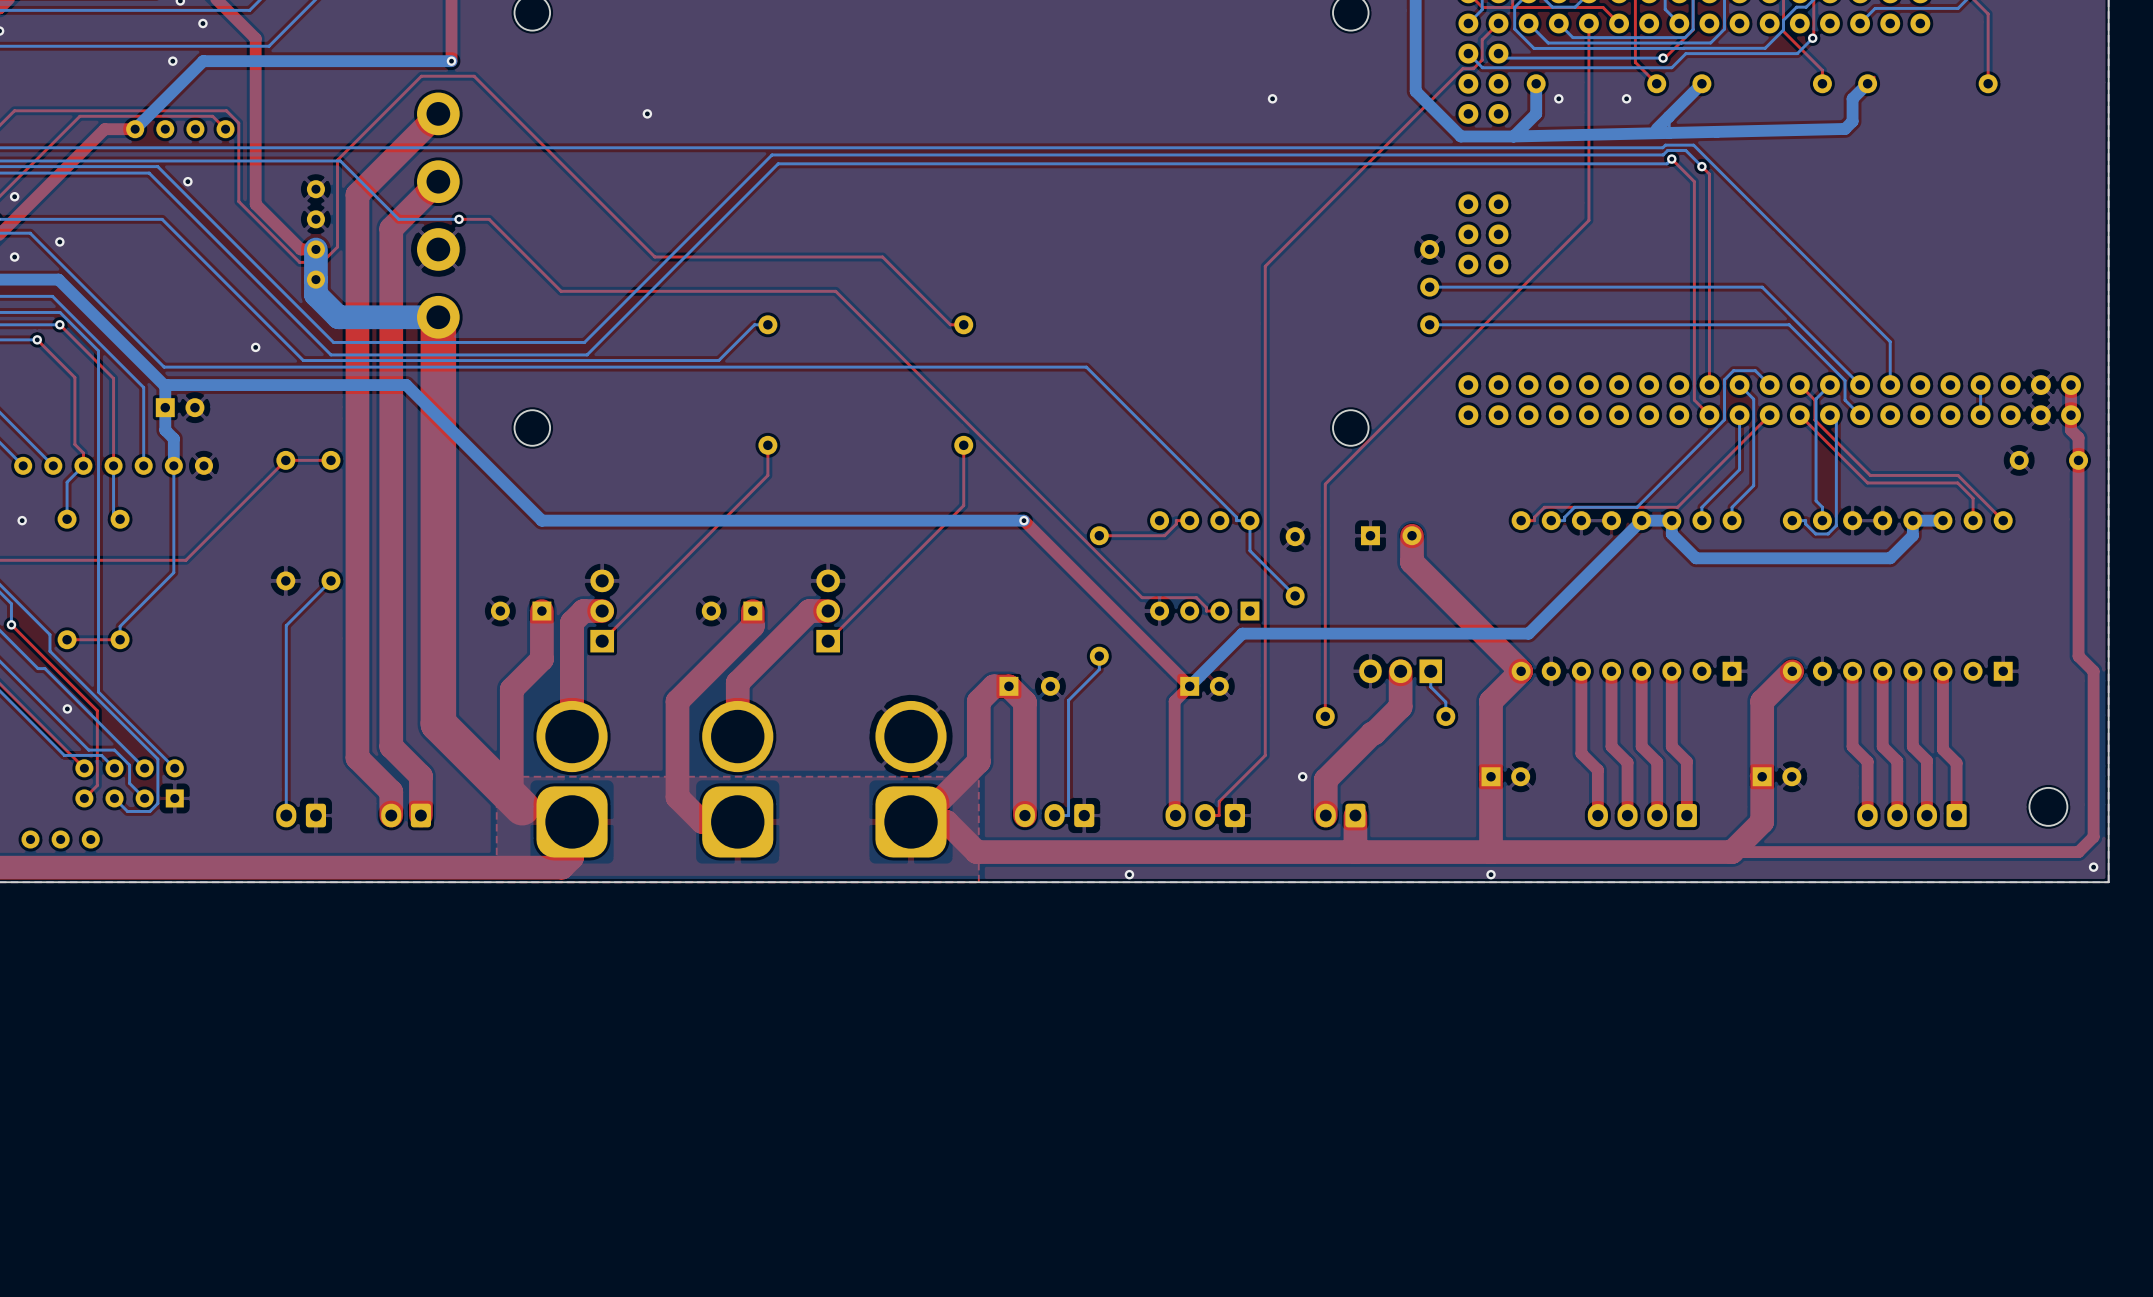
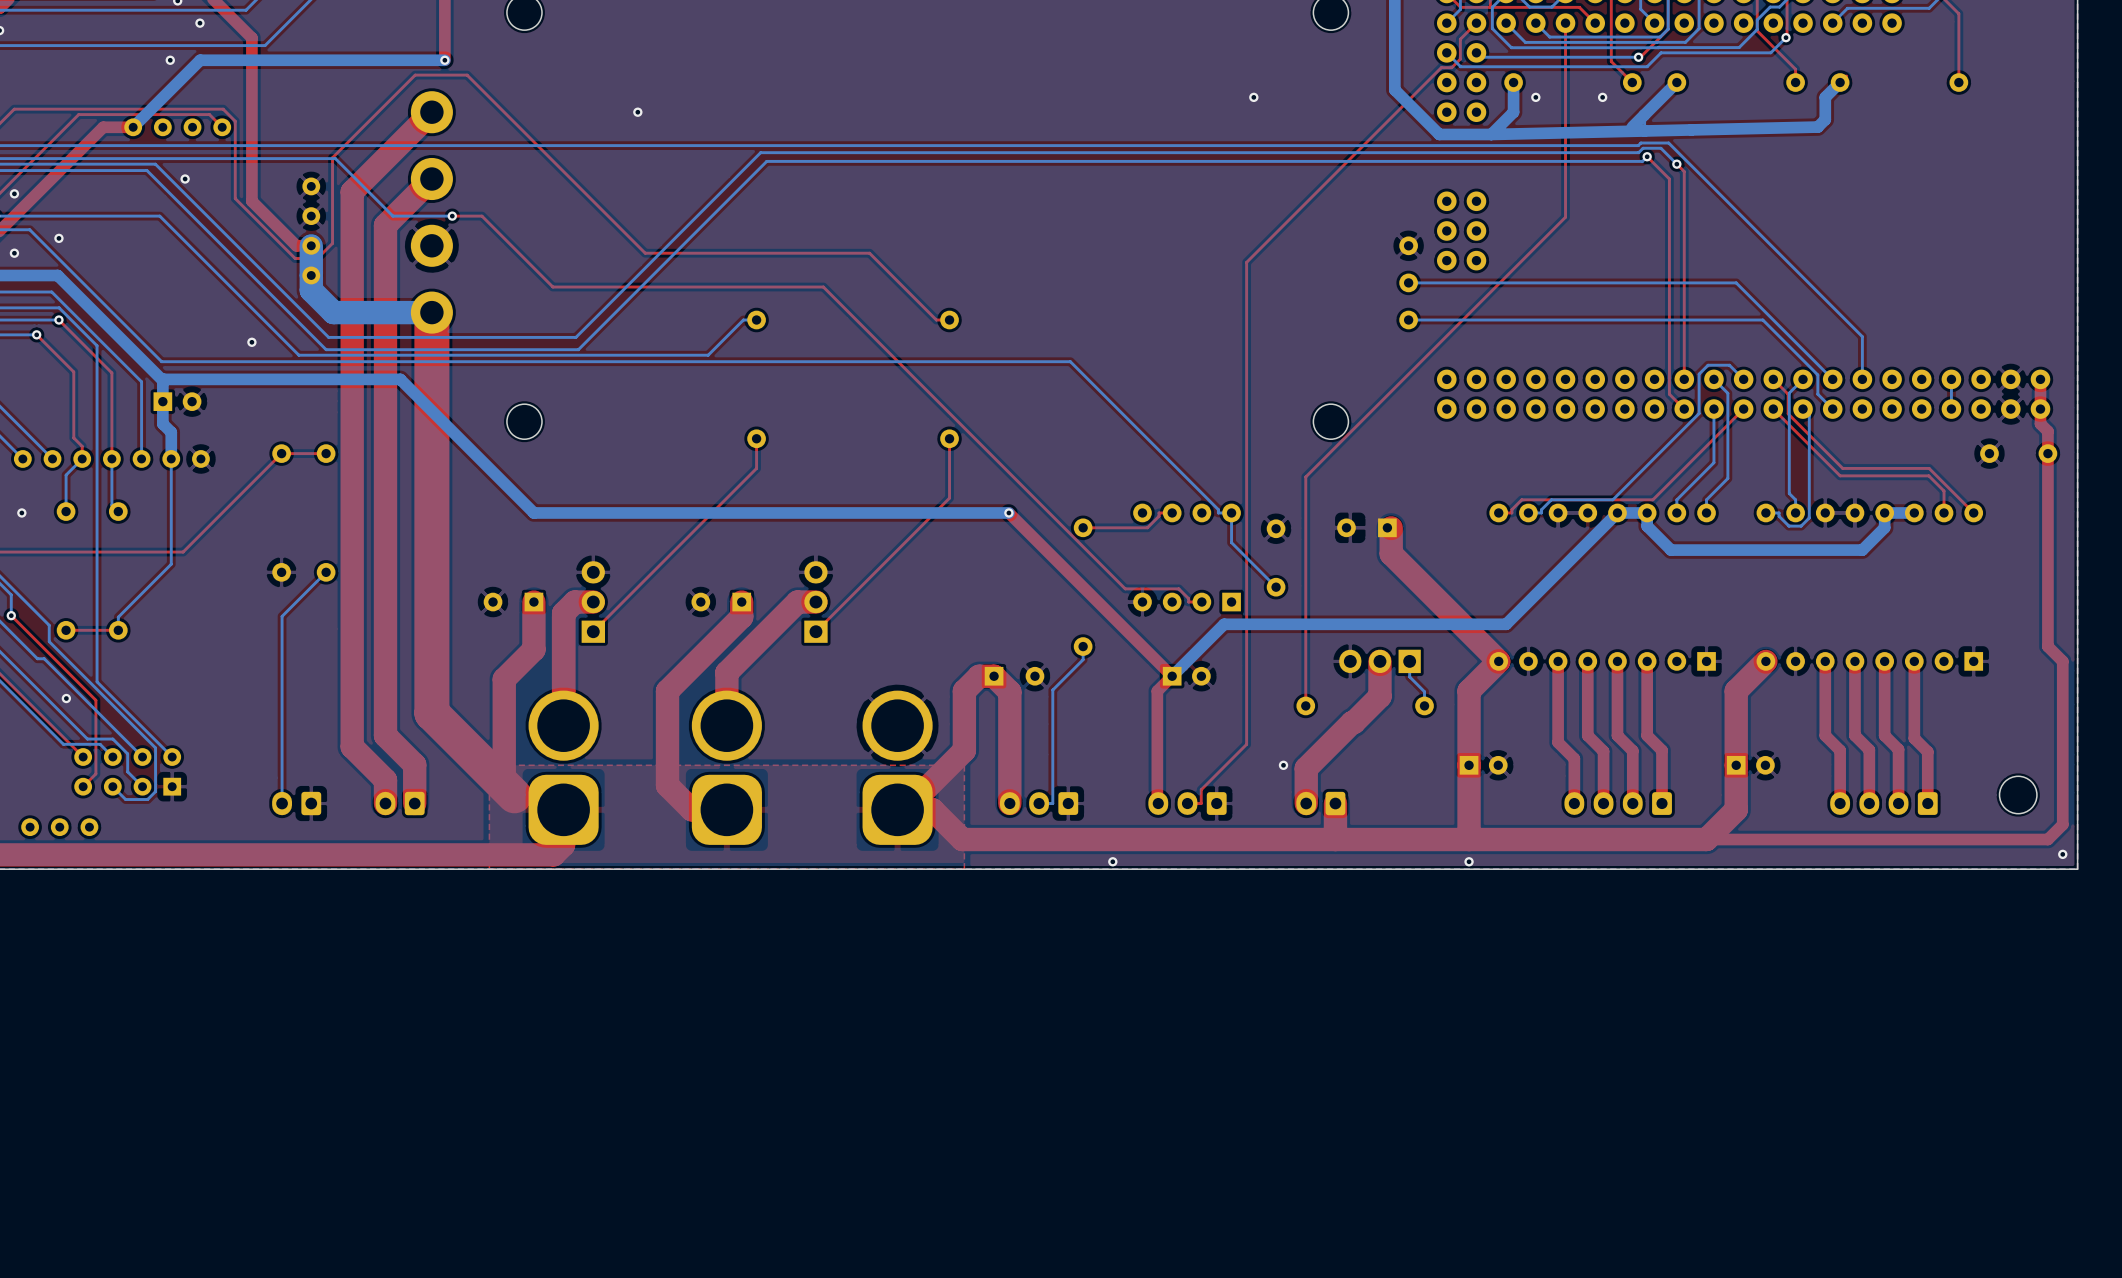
part rotation: 0° (1391, 535) -> 180° (1366, 527)

